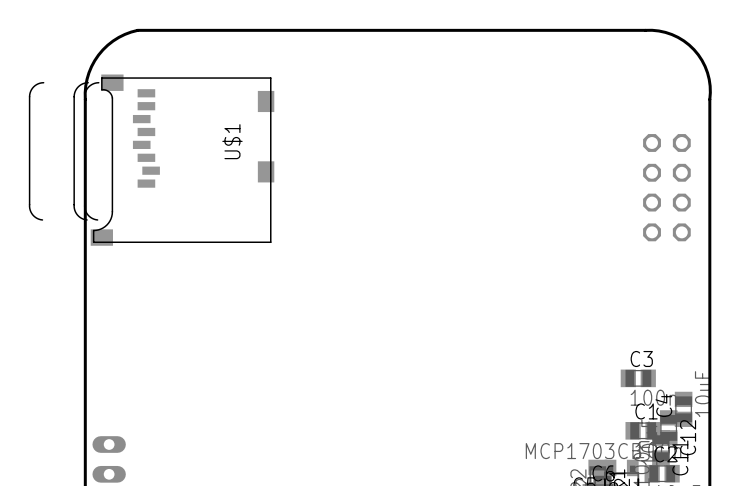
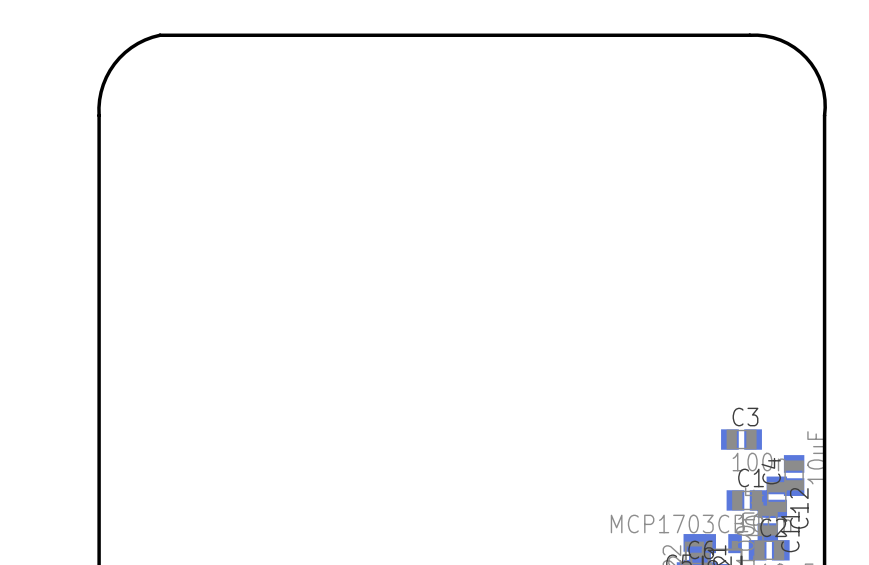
U$1: (151, 160) -> none
part: (666, 187) -> none
part: (109, 459) -> none

